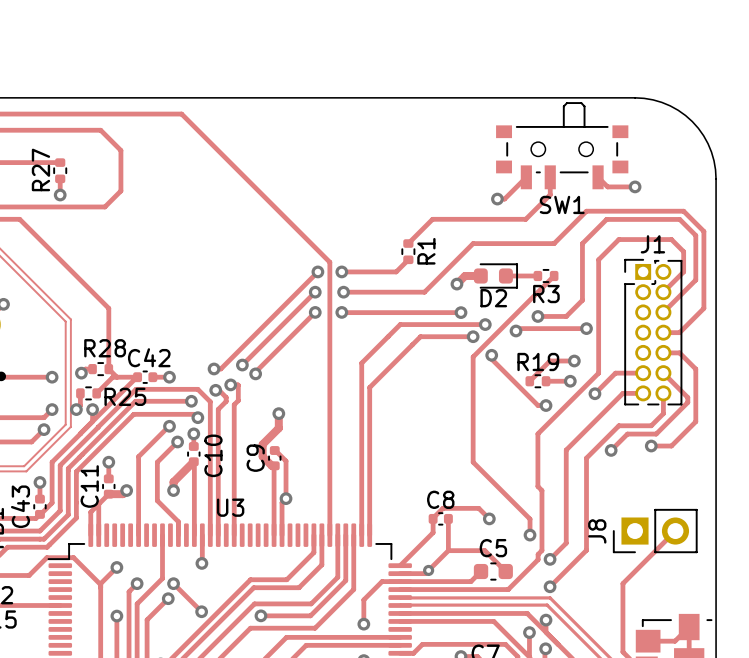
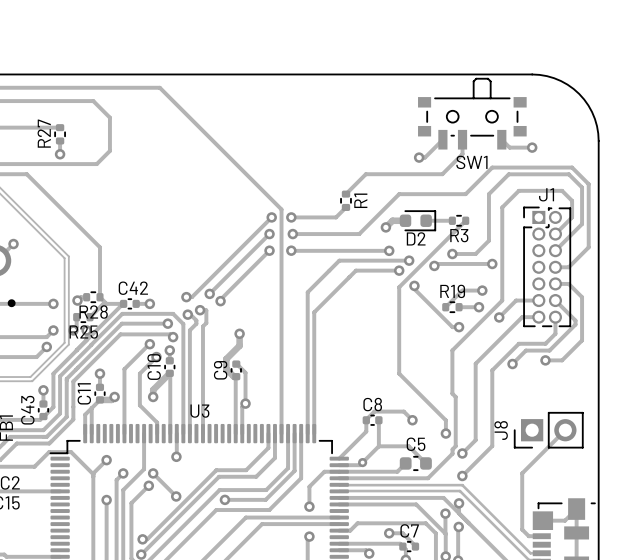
R28 name position: R28 (105, 348) -> R28 (93, 312)
R25 name position: R25 (125, 396) -> R25 (83, 331)
C10 name position: C10 (213, 455) -> C10 (154, 367)

